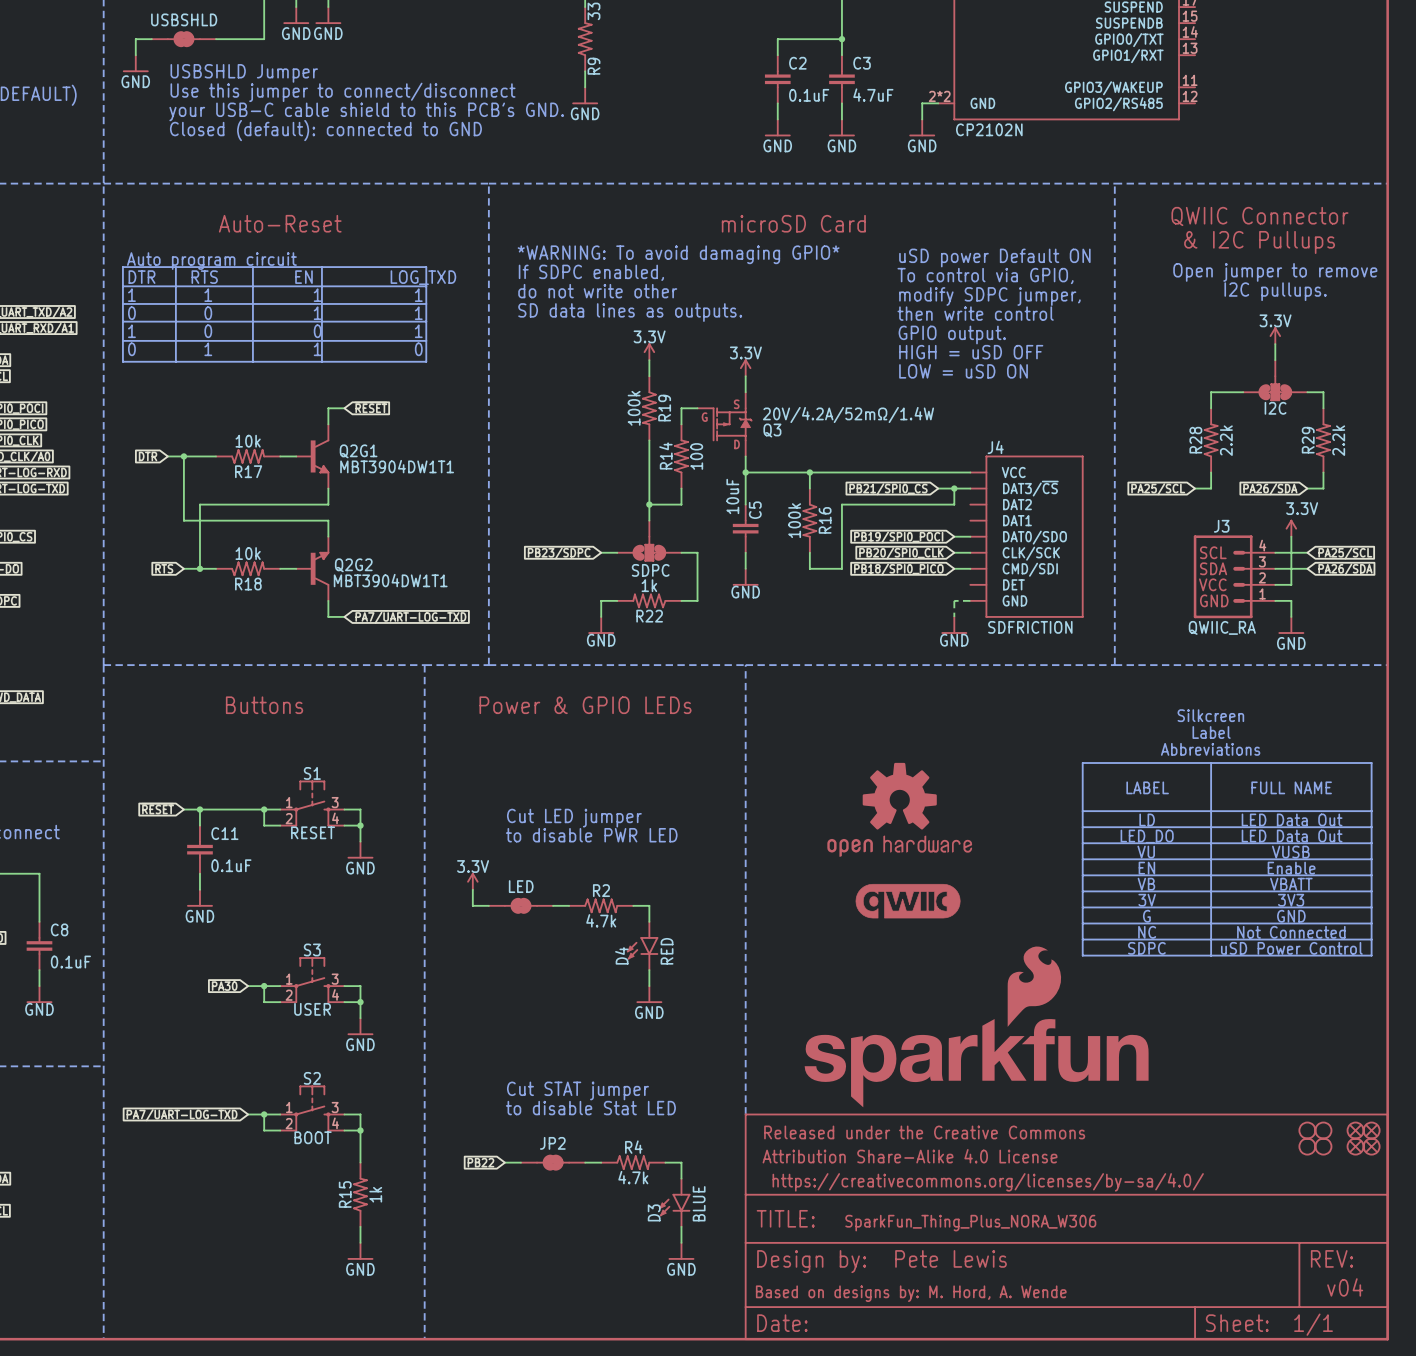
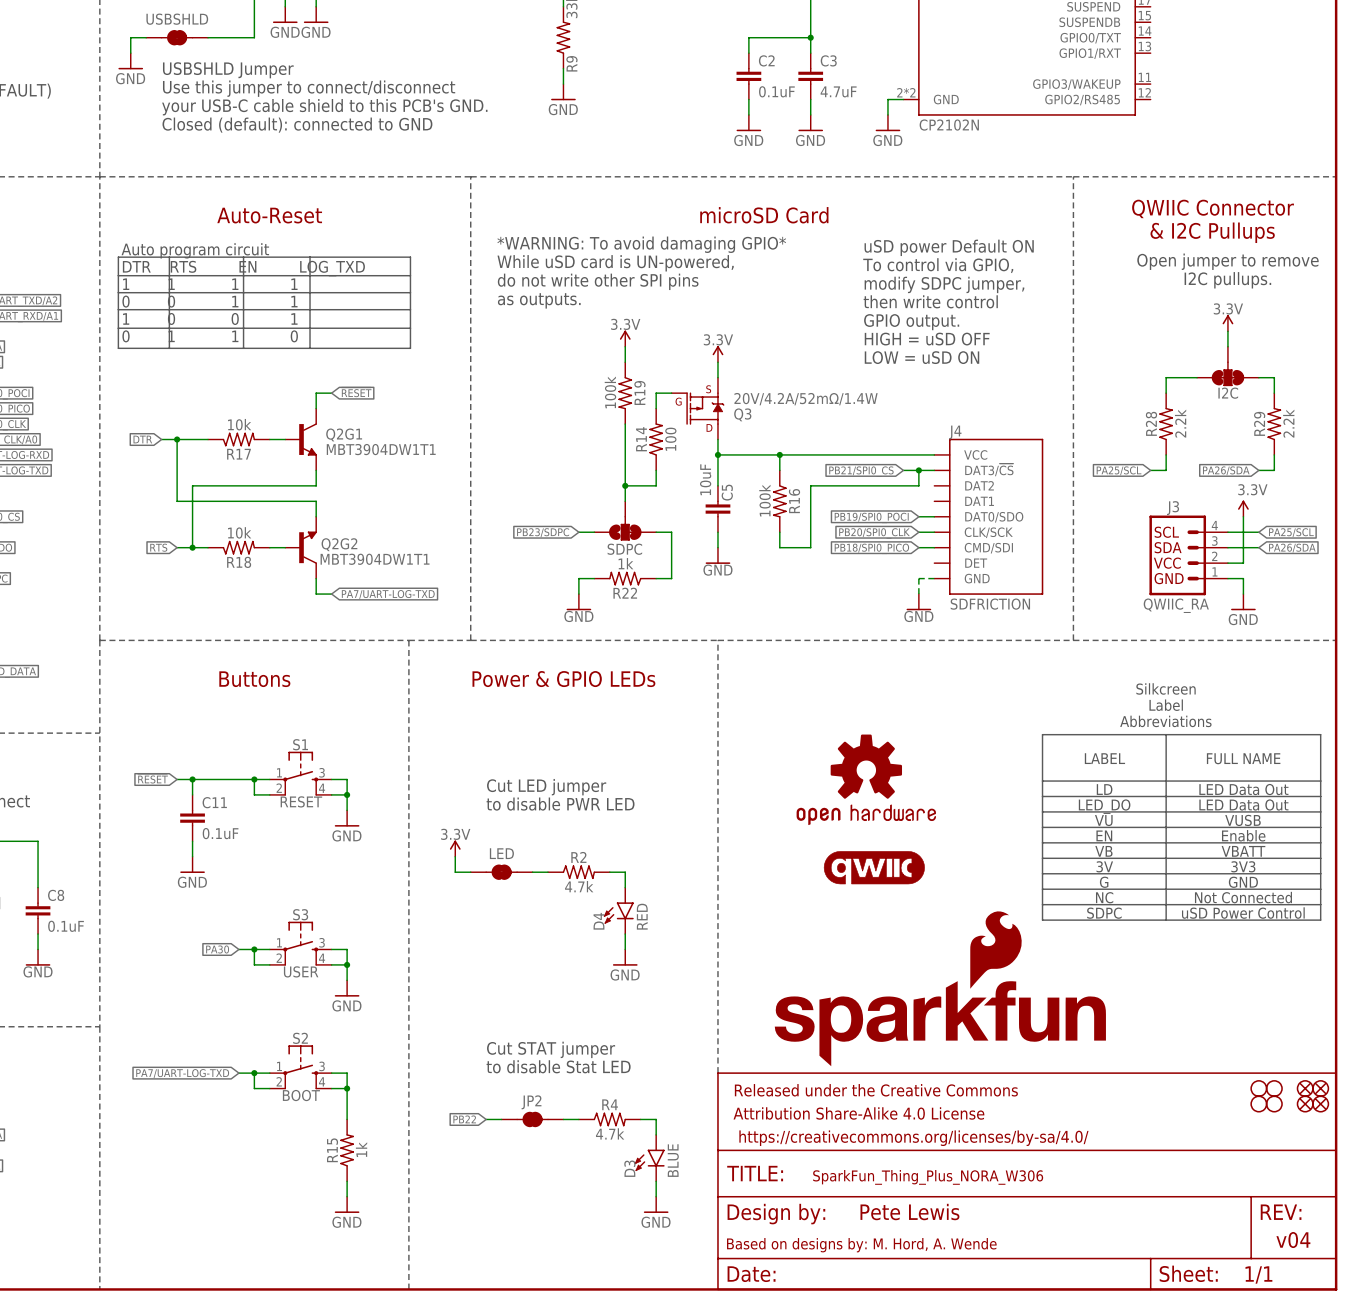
text: If SDPC enabled, (591, 272) -> While uSD card is UN-powered, (615, 263)
text: do not write other (597, 291) -> do not write other SPI pins (598, 281)
text: SD data lines as outputs. (630, 312) -> as outputs. (539, 300)

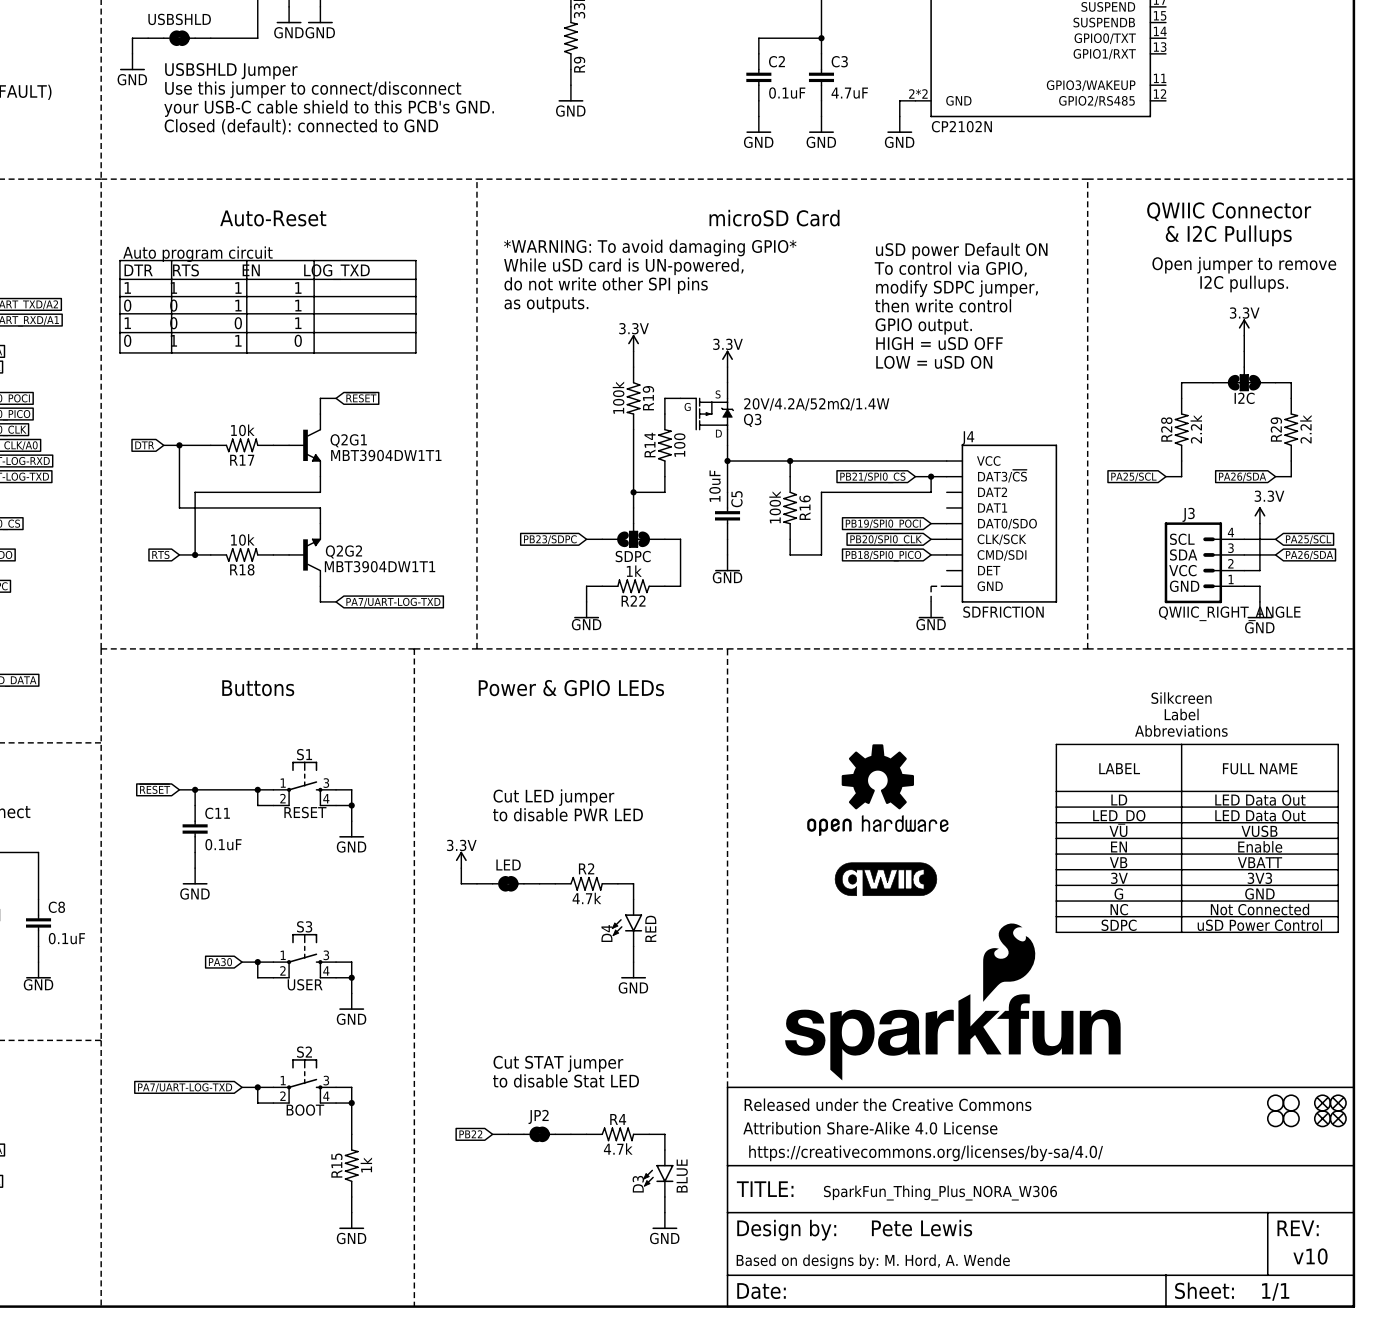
J3 value: QWIIC_RA (1176, 605) -> QWIIC_RIGHT_ANGLE (1229, 613)
text: v04 (1293, 1240) -> v10 (1310, 1256)

